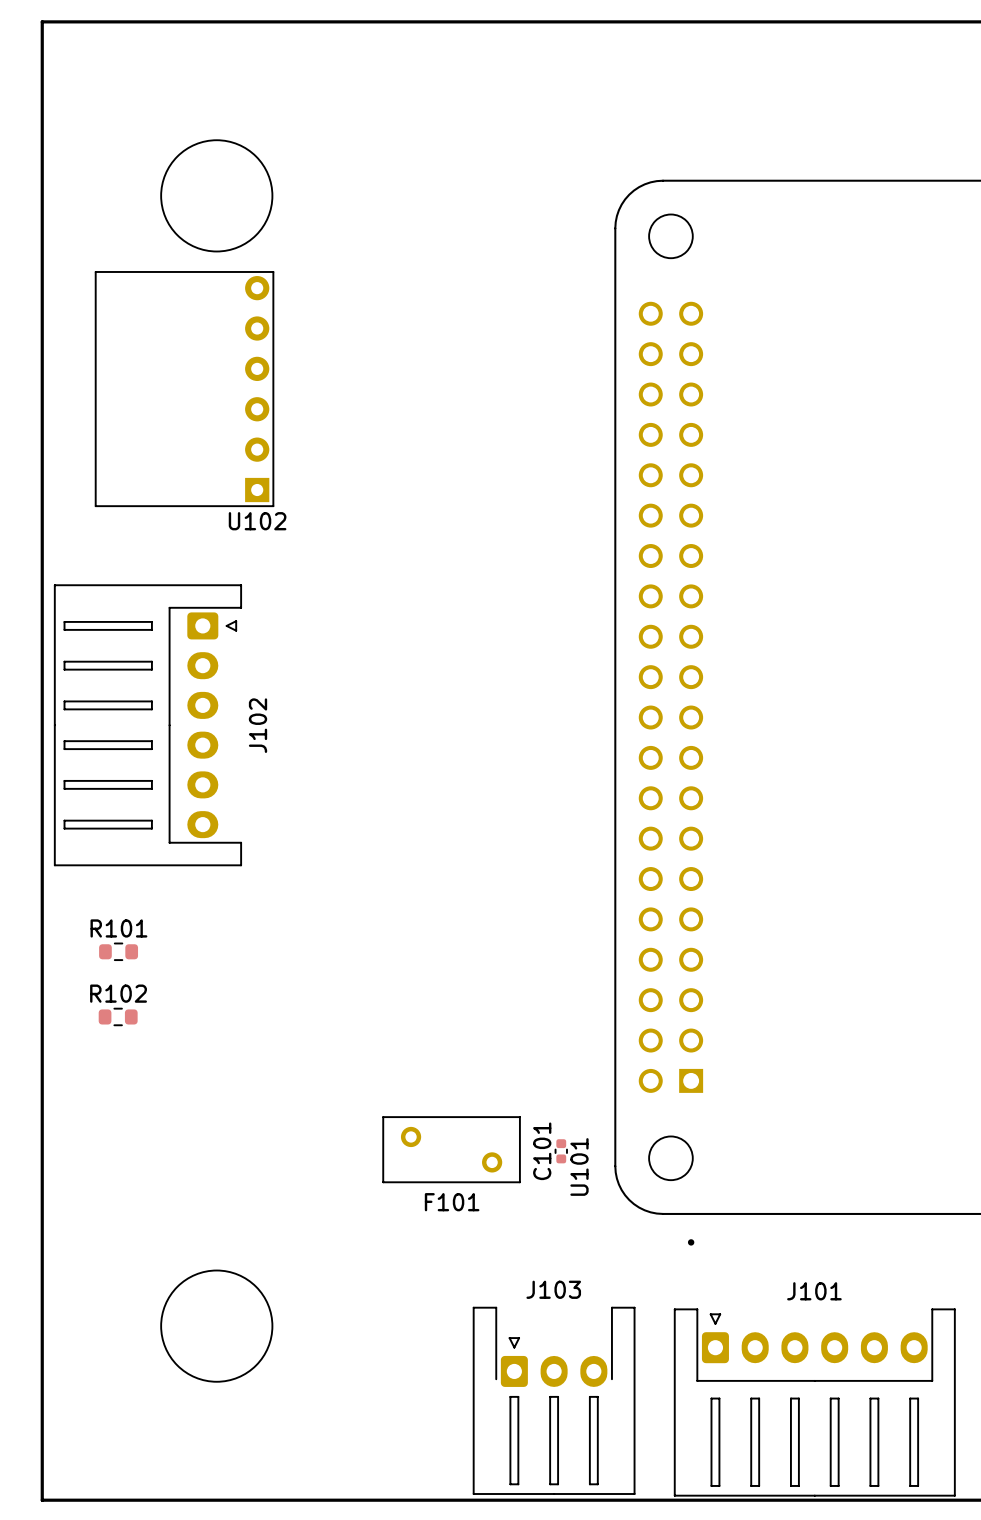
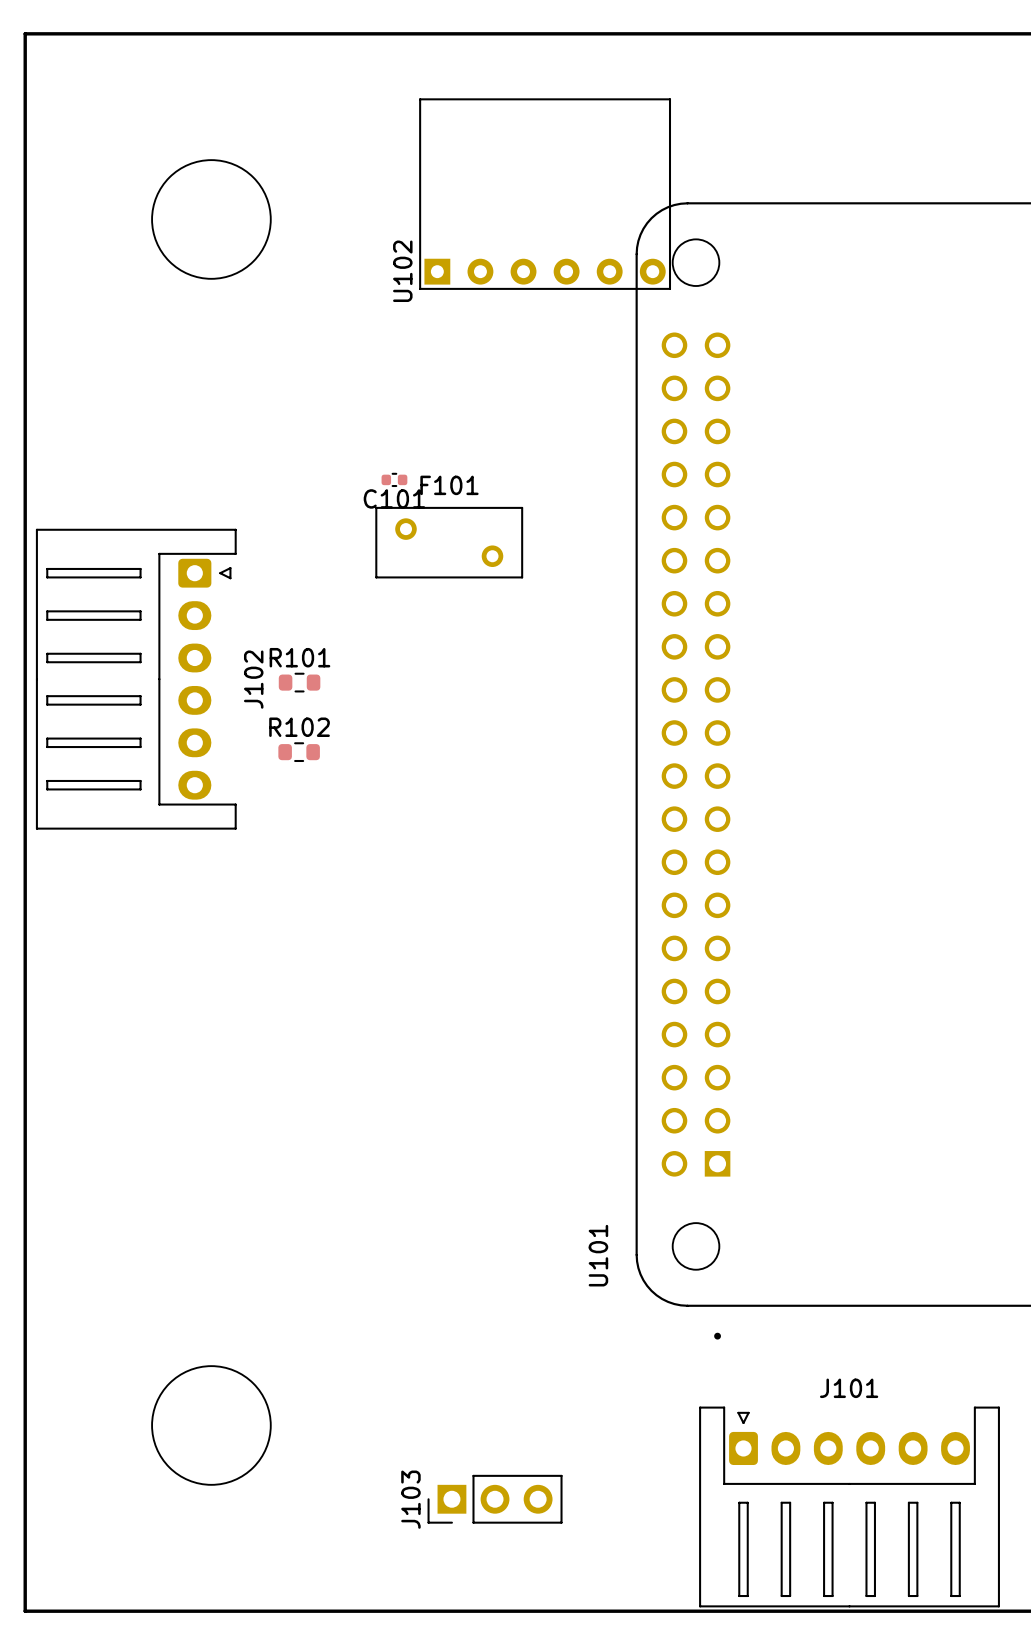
U102 rotation: 0° (184, 389) -> 90° clockwise (545, 194)
U102 position: (184, 389) -> (545, 194)
J102 position: (147, 725) -> (136, 679)
R101 position: (118, 951) -> (299, 682)
R102 position: (118, 1016) -> (299, 752)
F101 position: (451, 1149) -> (449, 542)
C101 rotation: 0° (561, 1151) -> 90° clockwise (394, 479)
C101 position: (561, 1151) -> (394, 479)
F101 name position: F101 (452, 1202) -> F101 (449, 485)
J103 name position: J103 (553, 1289) -> J103 (410, 1499)
J103 footprint: [472, 1306, 636, 1495] -> [427, 1474, 563, 1524]

